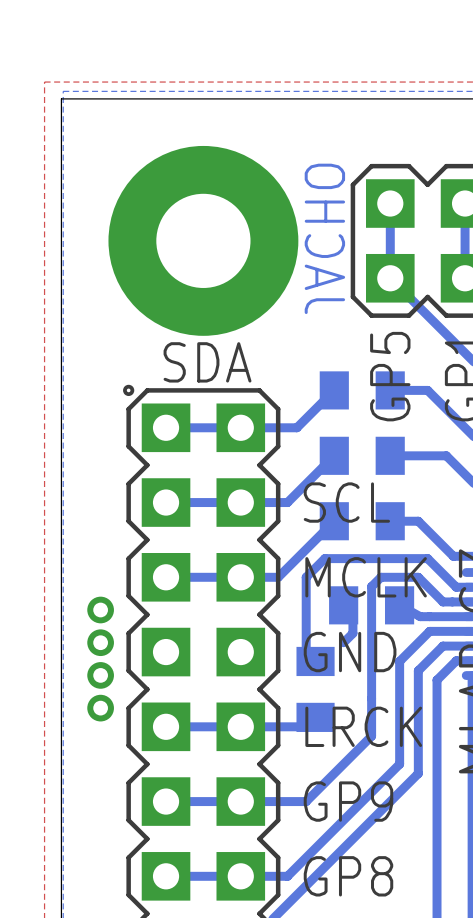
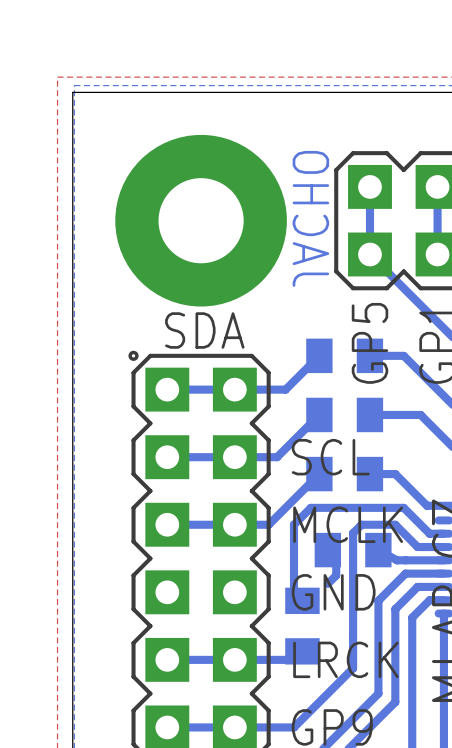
via: (100, 610) -> none
via: (100, 642) -> none
via: (100, 675) -> none
via: (100, 708) -> none

